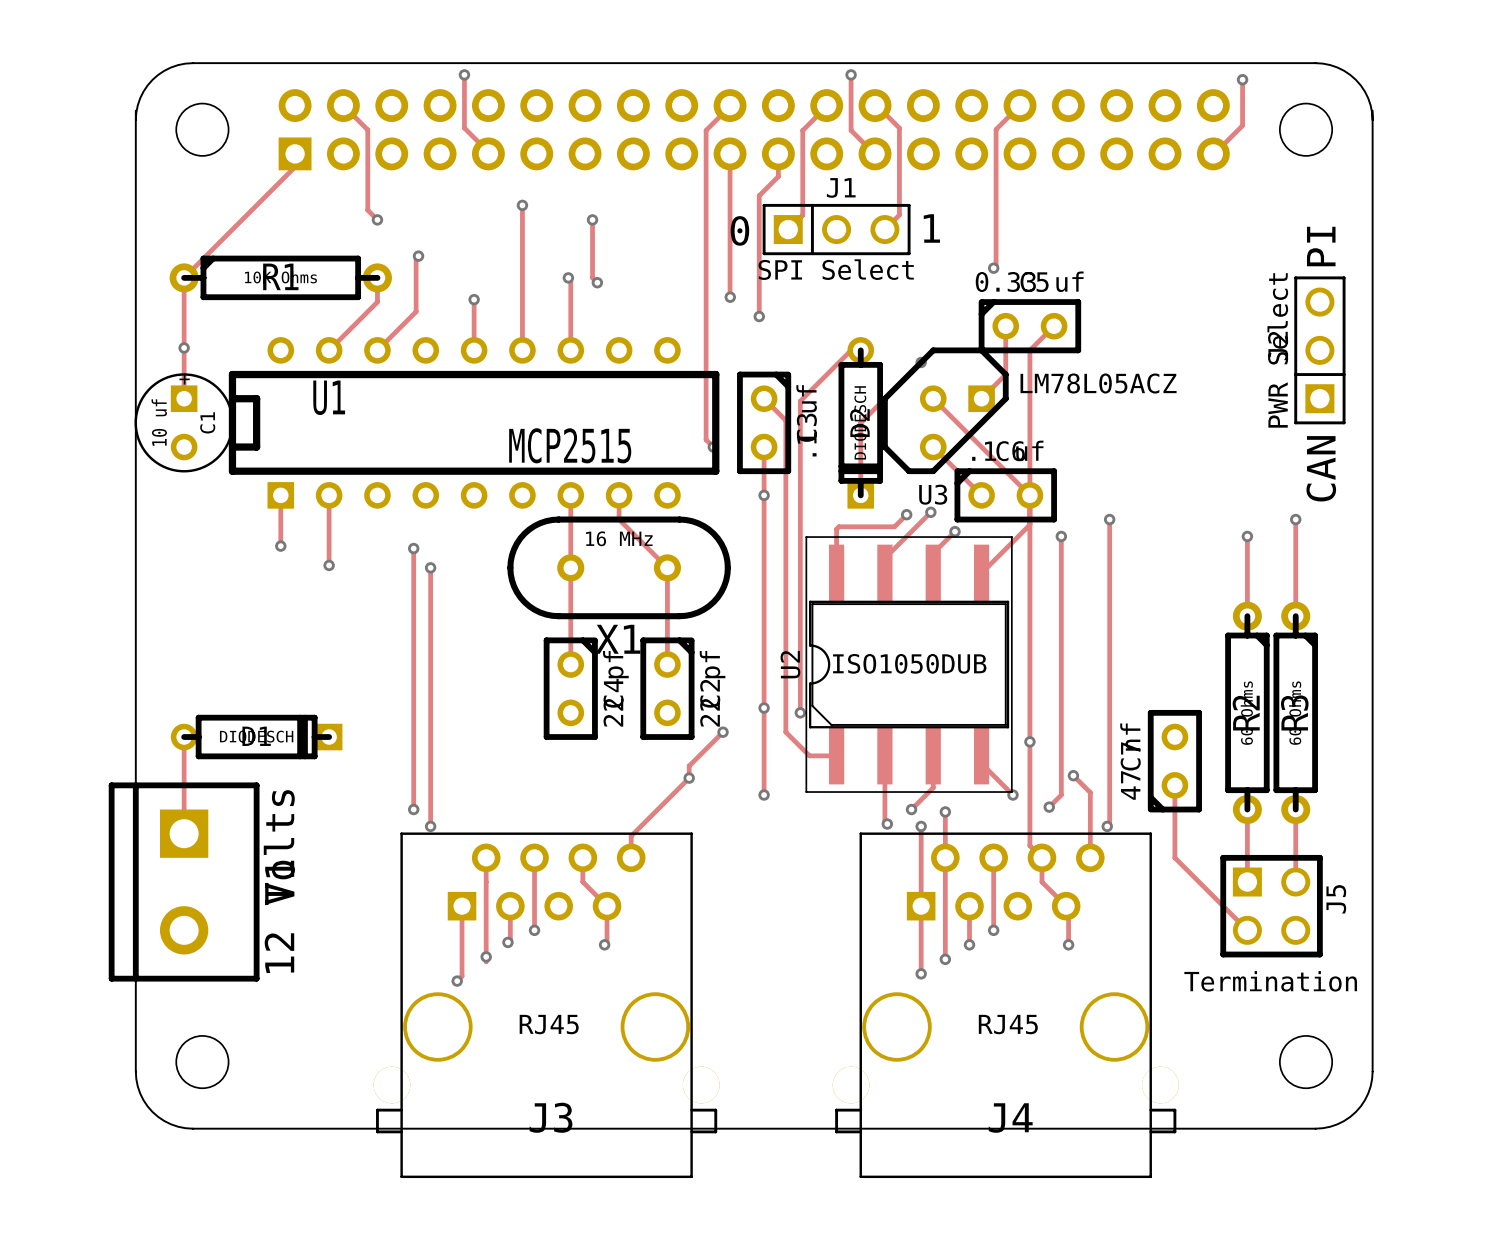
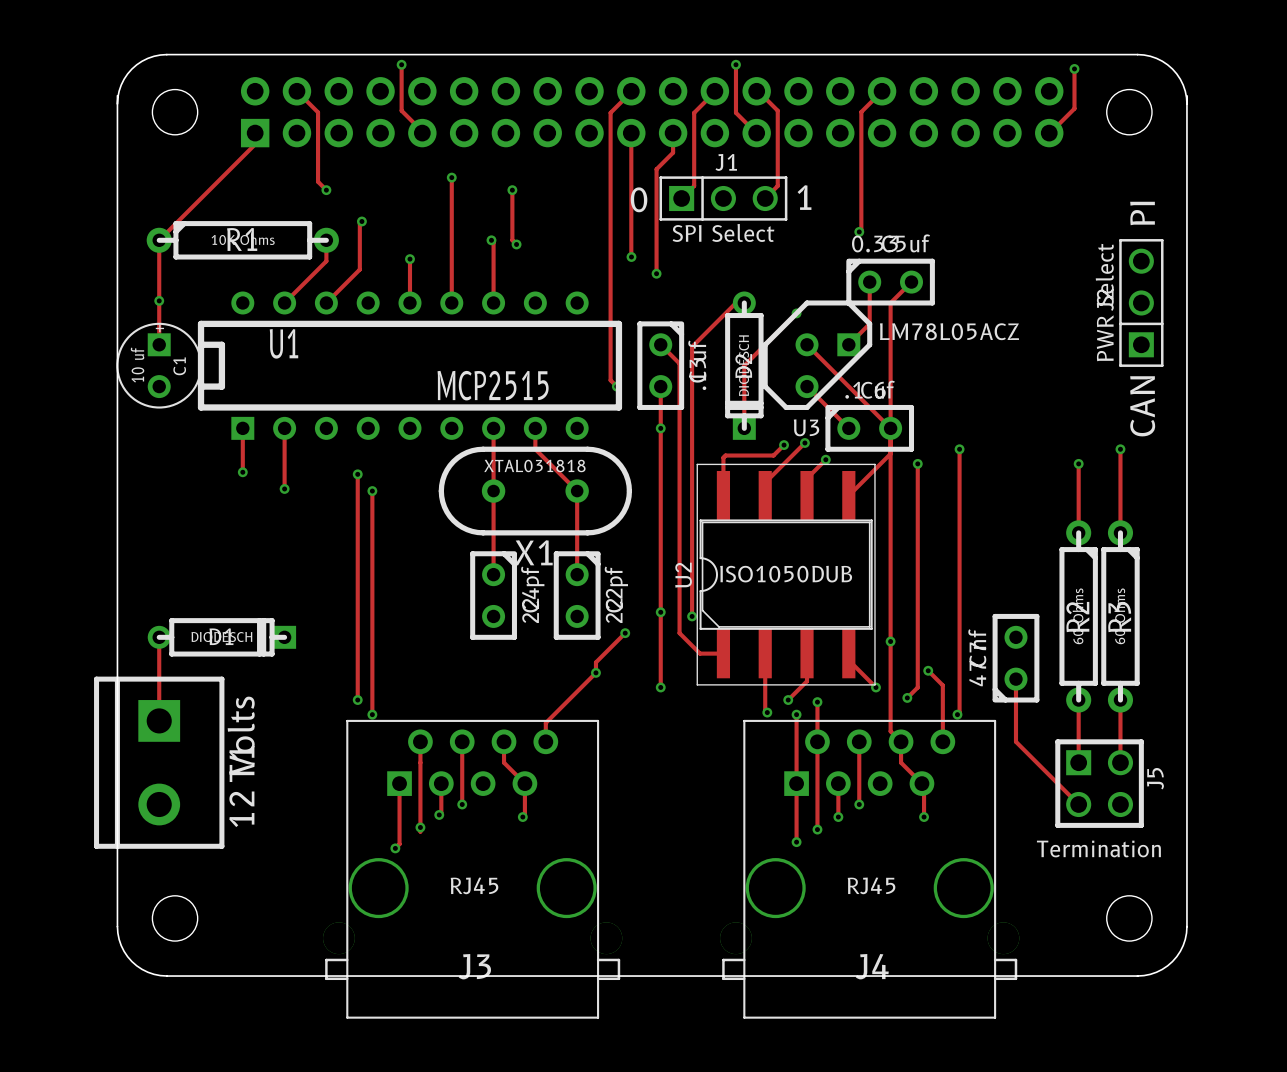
X1 value: 16 MHz (619, 538) -> XTAL031818 (534, 465)

